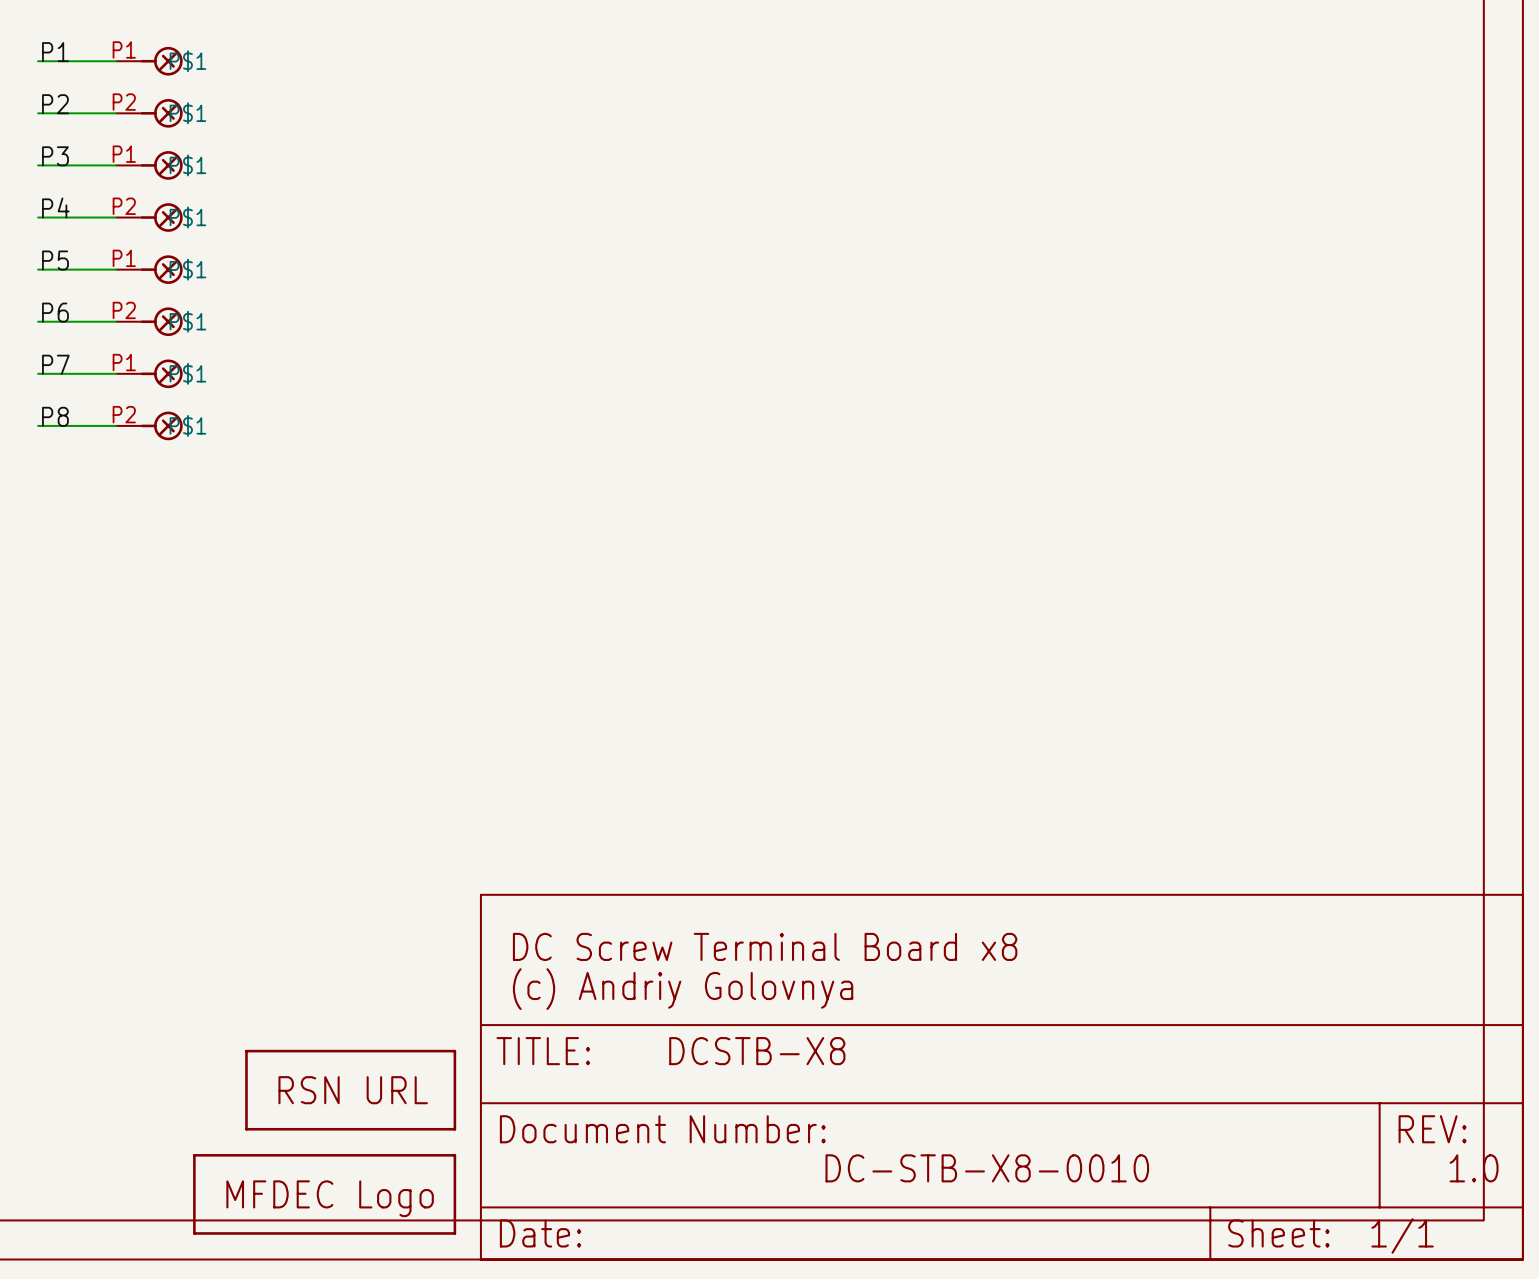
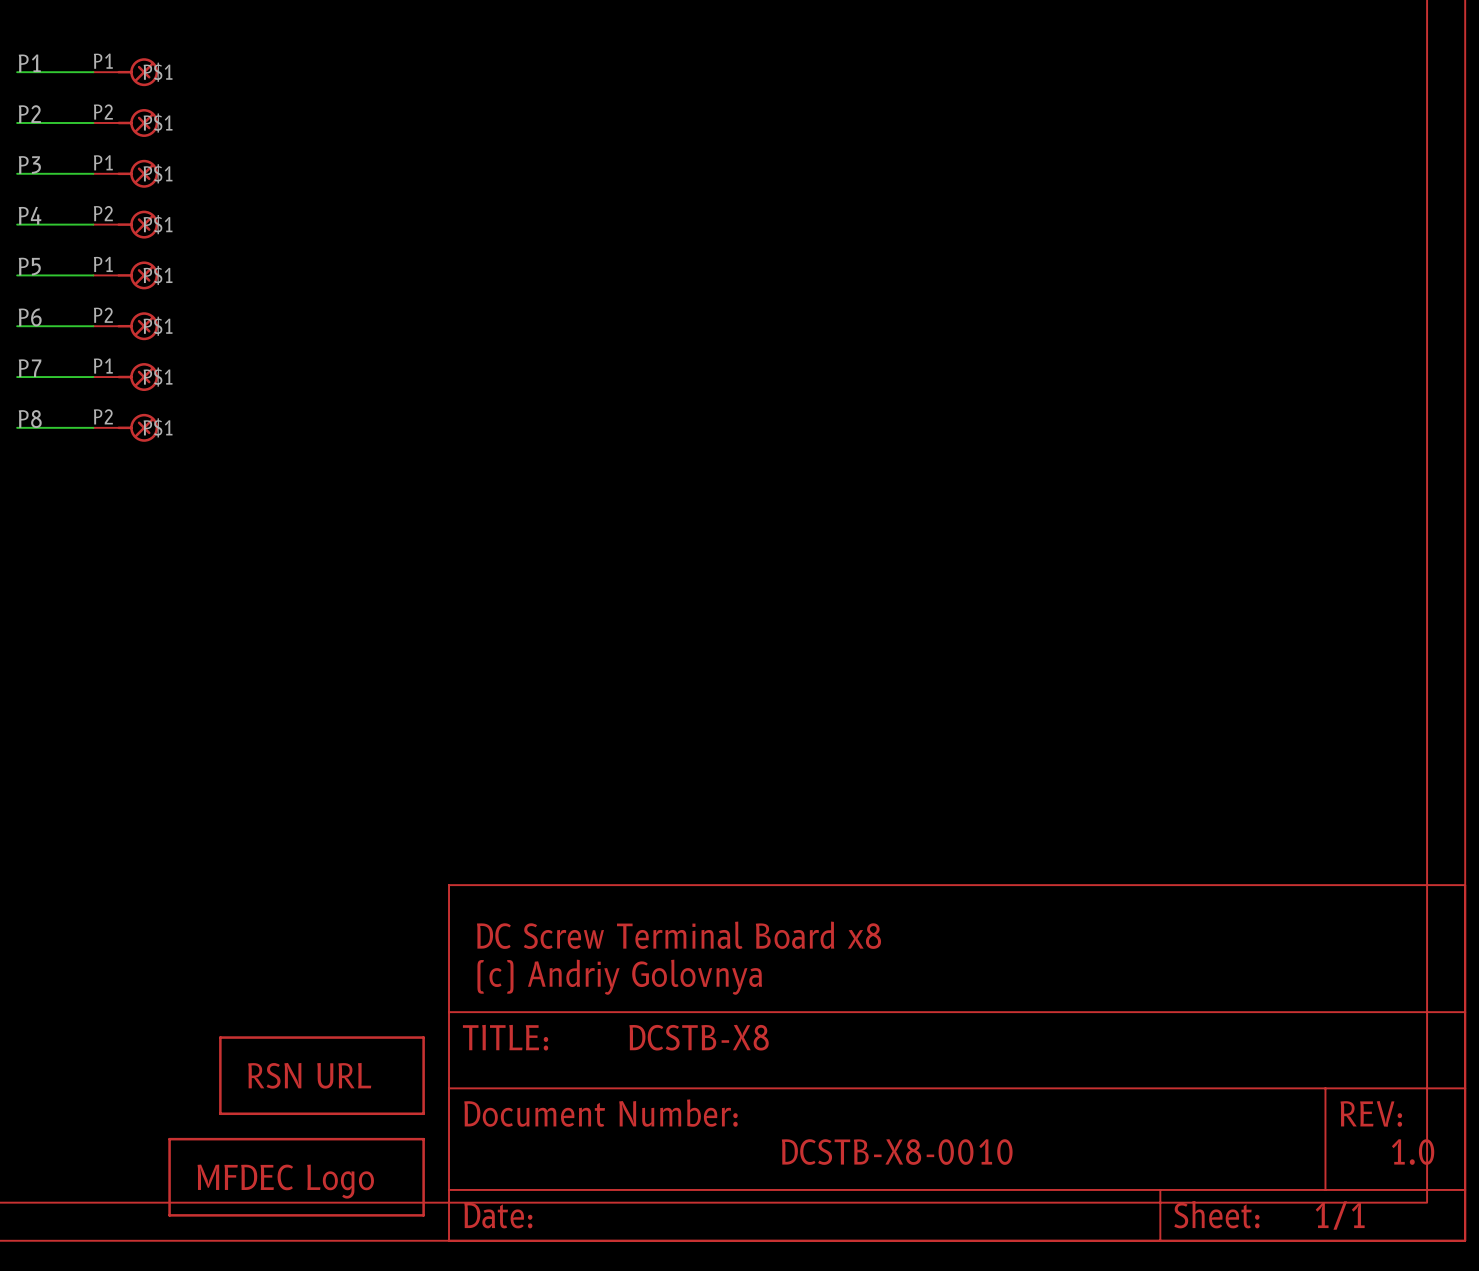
text: DC-STB-X8-0010 (987, 1168) -> DCSTB-X8-0010 (897, 1152)

